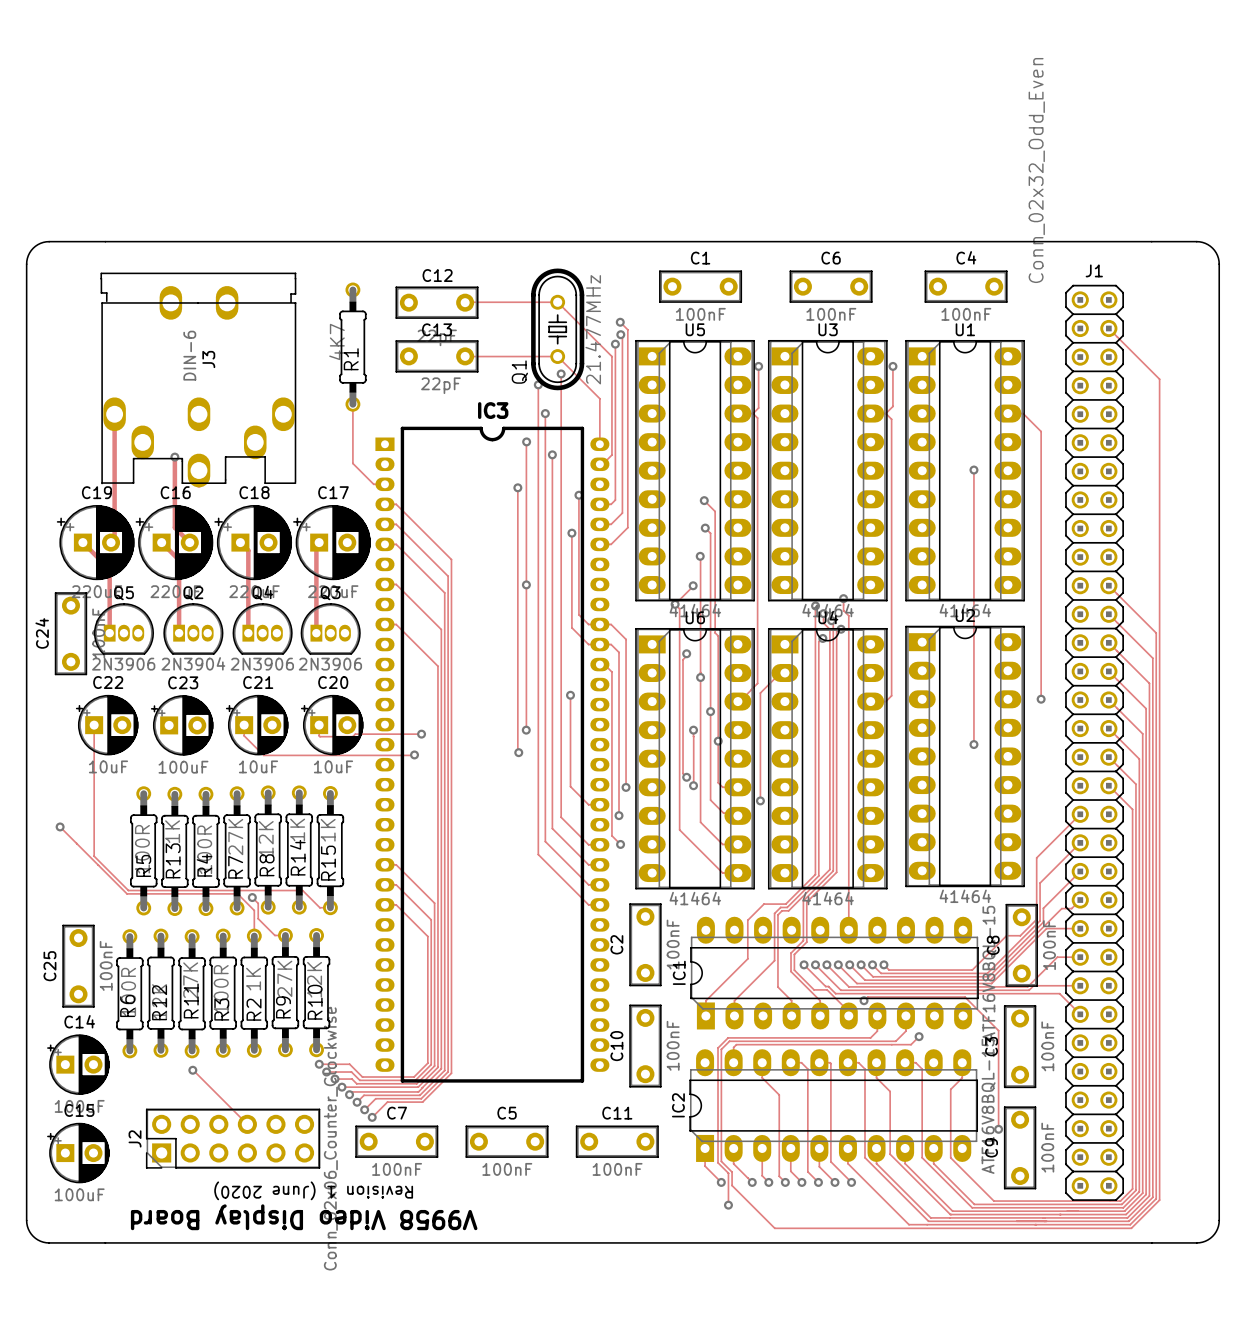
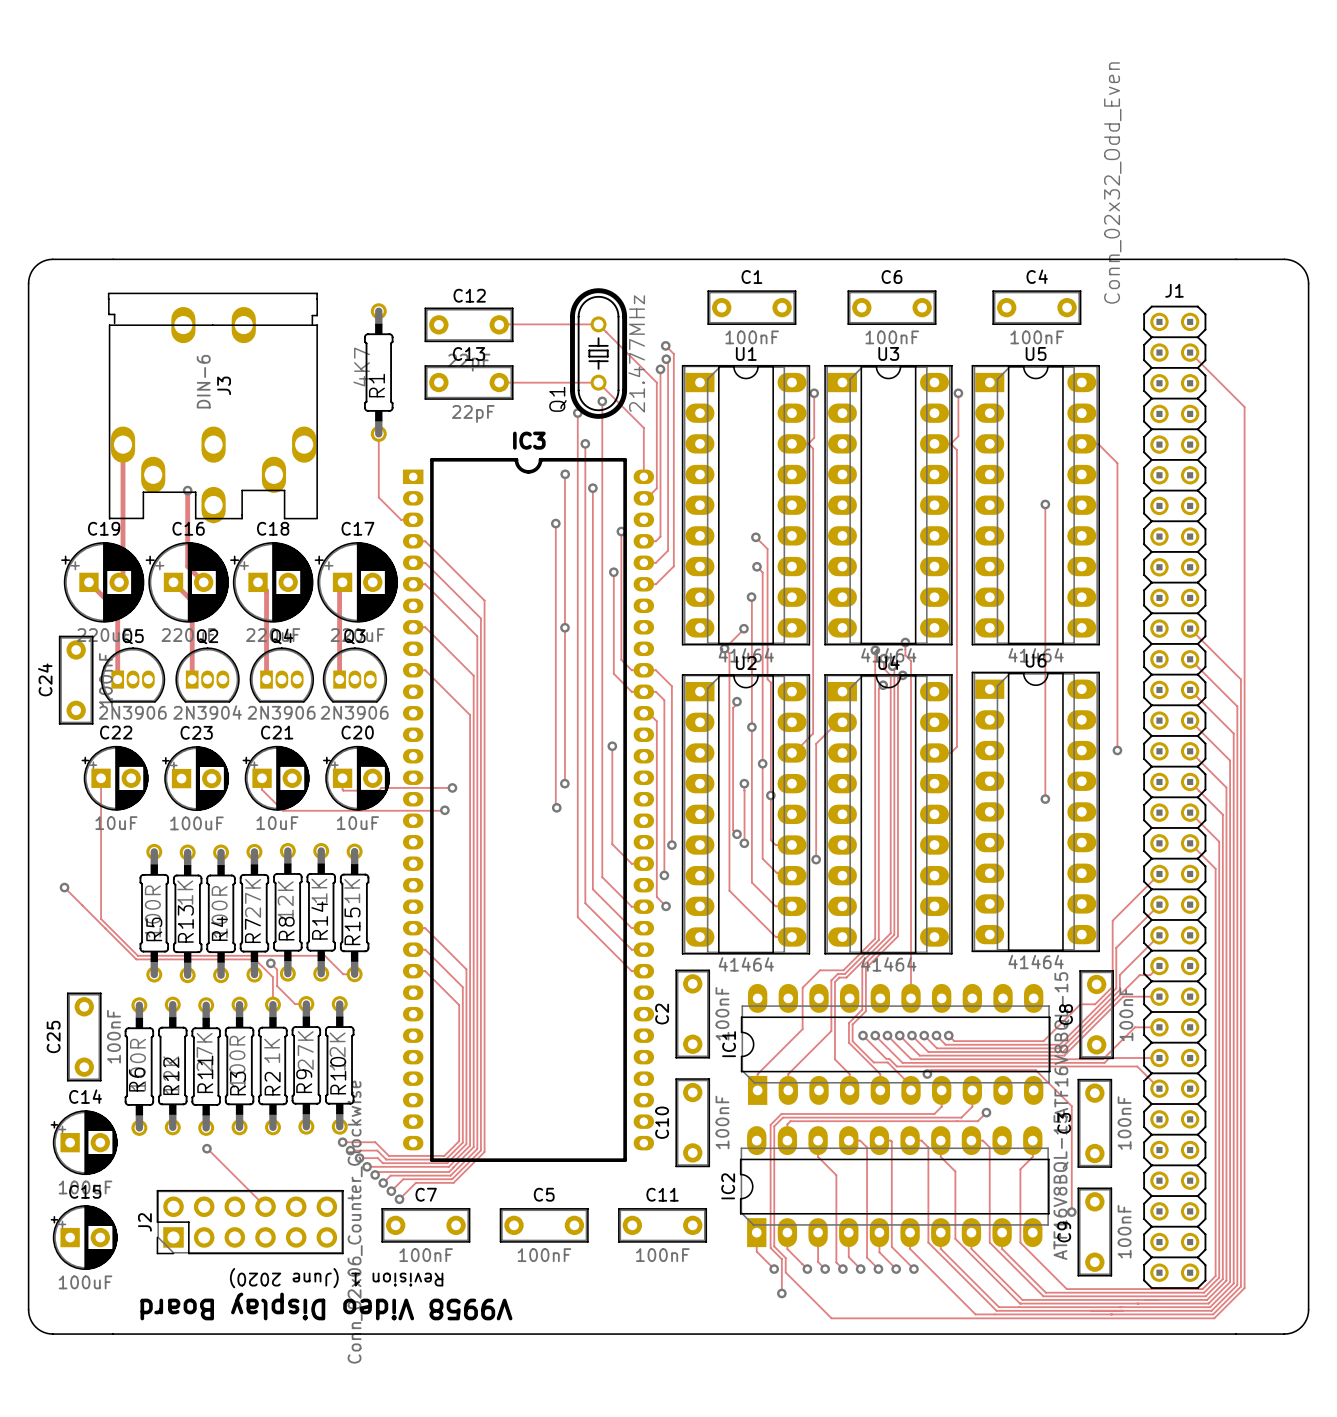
U5 name: U5 (695, 329) -> U1 (746, 353)
U1 name: U1 (965, 329) -> U5 (1036, 353)
U2 name: U2 (965, 615) -> U6 (1036, 660)
U6 name: U6 (695, 617) -> U2 (746, 663)

